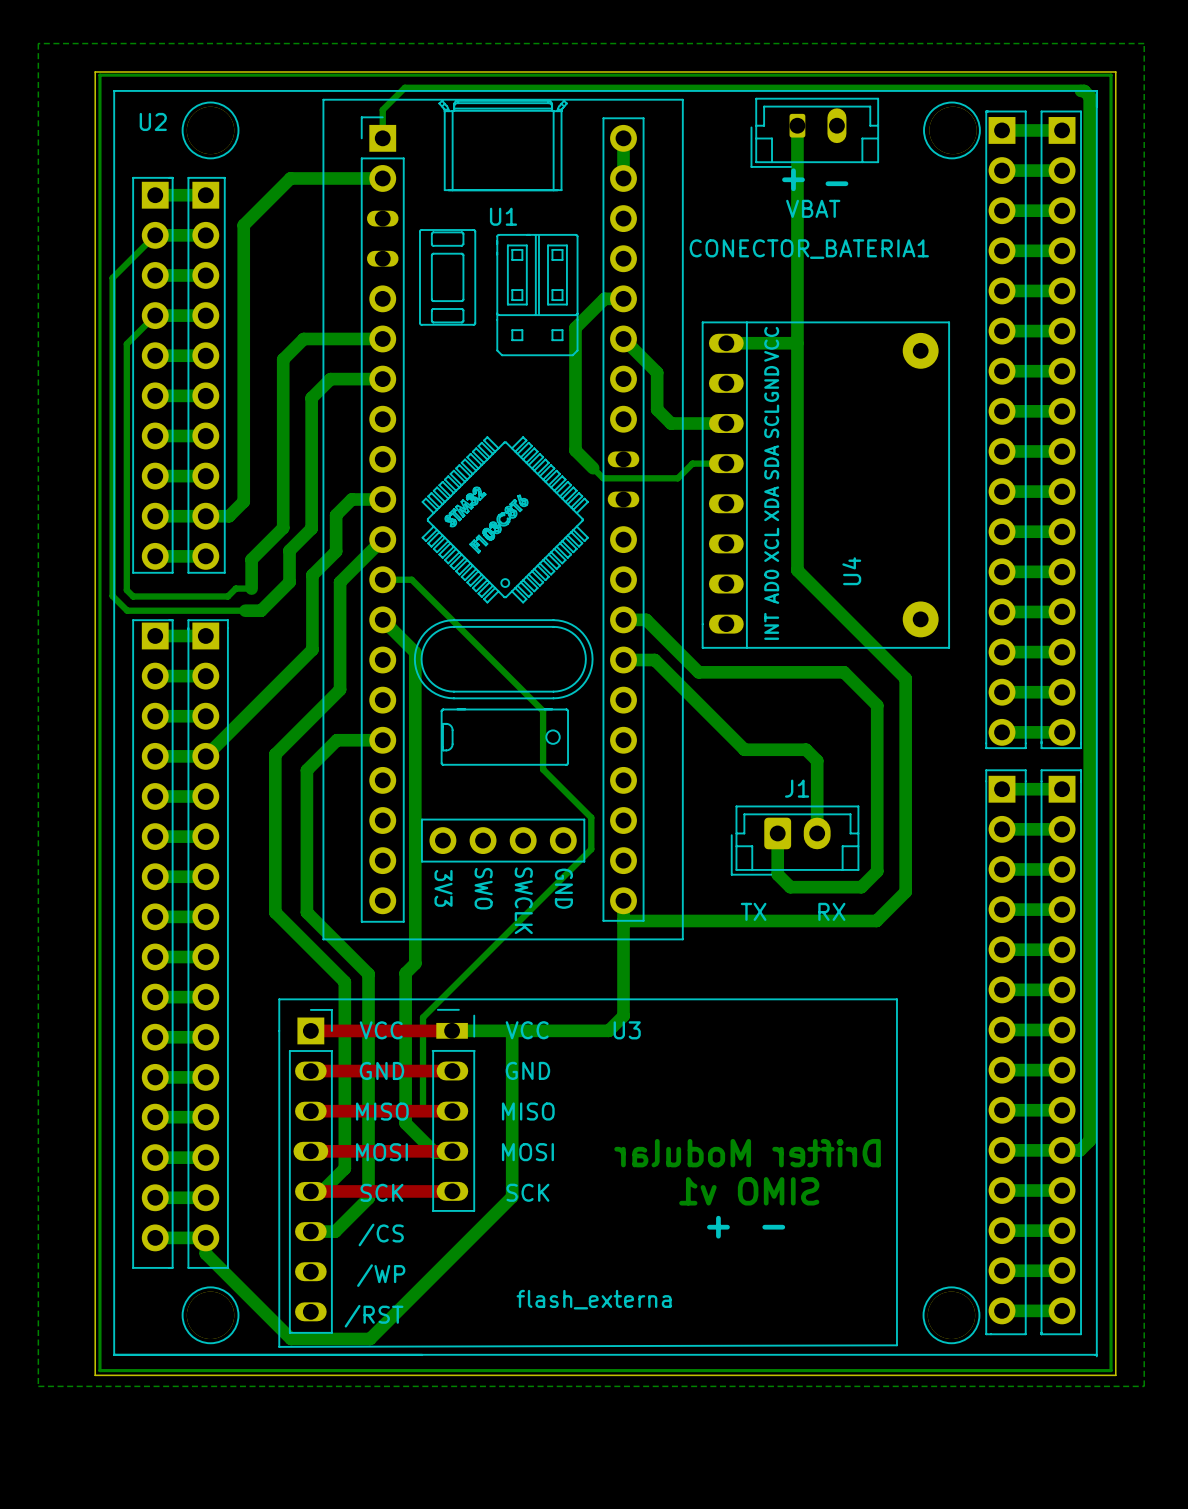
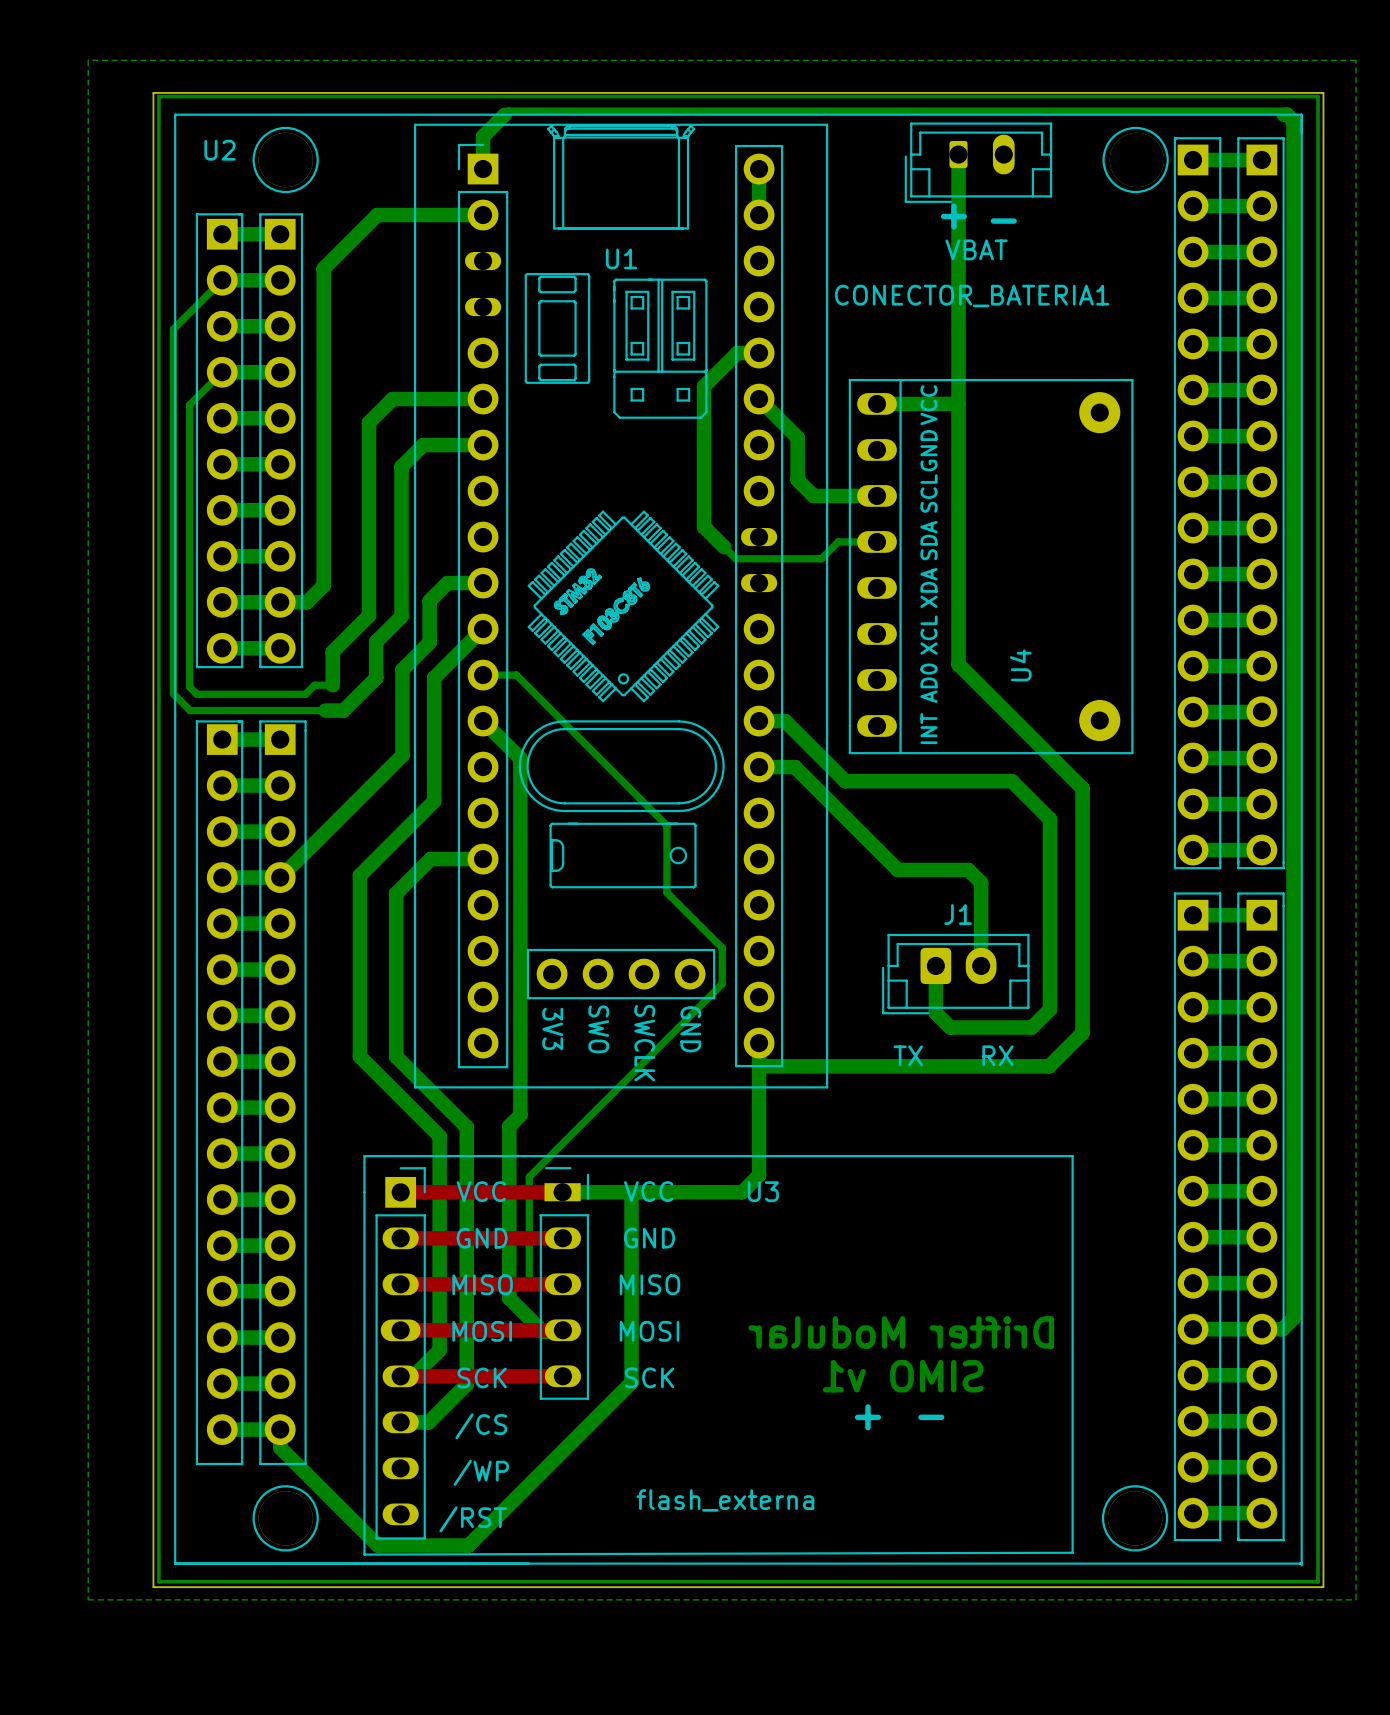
bottom track width: thin (401, 90) (382, 109) (382, 138) -> thick (504, 114) (483, 136) (483, 169)

